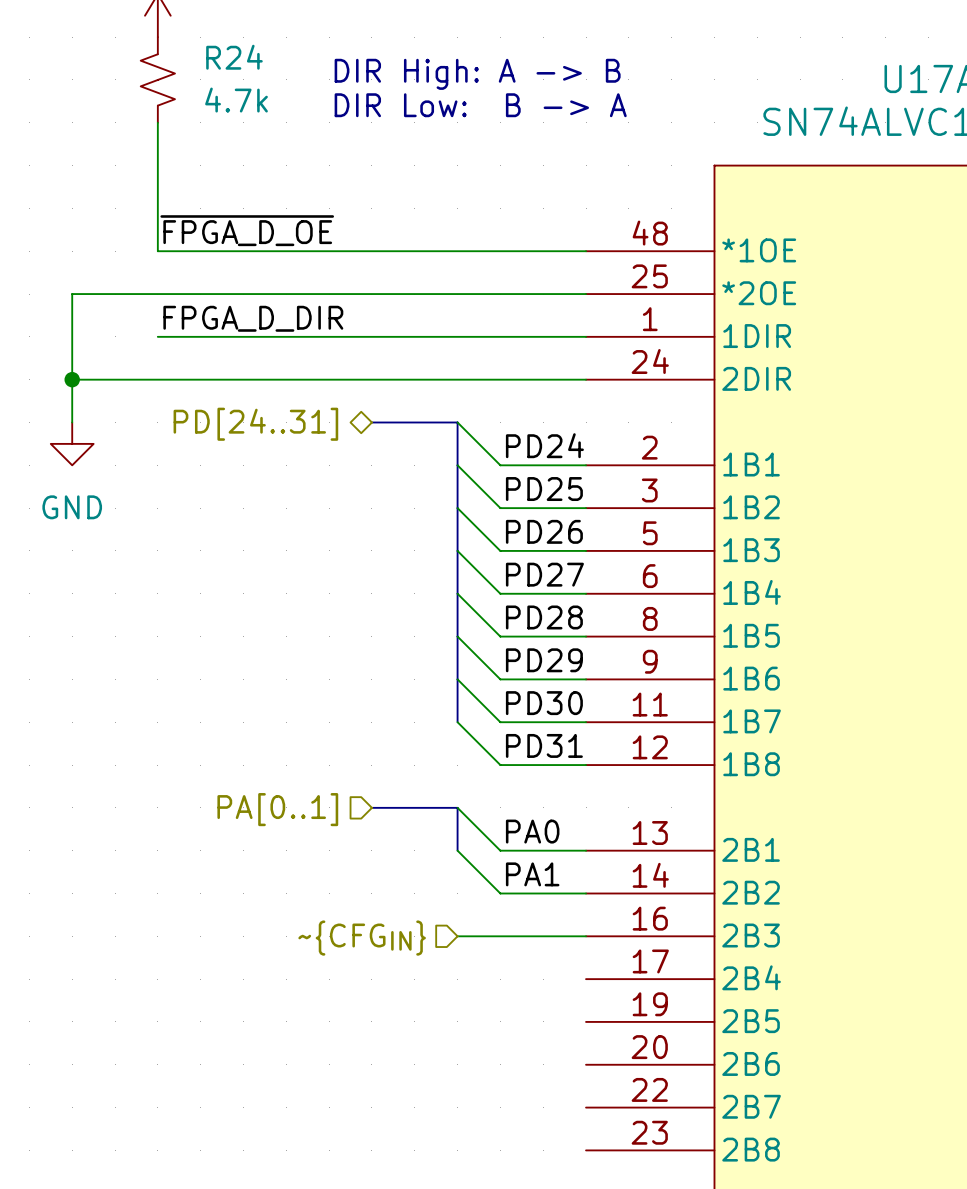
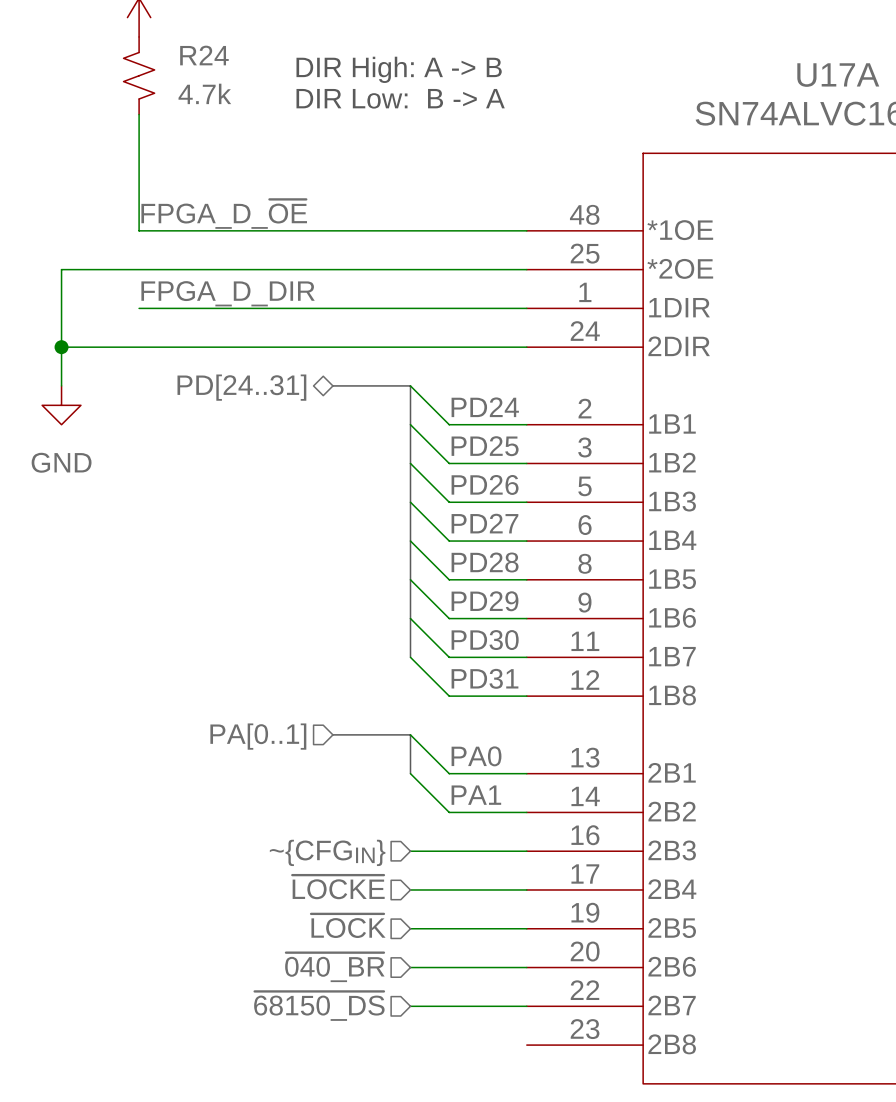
label: ~{FPGA_D_OE} (247, 230) -> FPGA_D_~{OE} (224, 214)
hierarchical label: none -> ~{LOCKE} (338, 887)
wire: none -> (410, 889) (526, 889)
hierarchical label: none -> ~{LOCK} (348, 925)
wire: none -> (410, 928) (526, 928)
hierarchical label: none -> ~{040_BR} (334, 967)
wire: none -> (410, 967) (526, 967)
hierarchical label: none -> ~{68150_DS} (319, 1006)
wire: none -> (410, 1006) (526, 1006)

